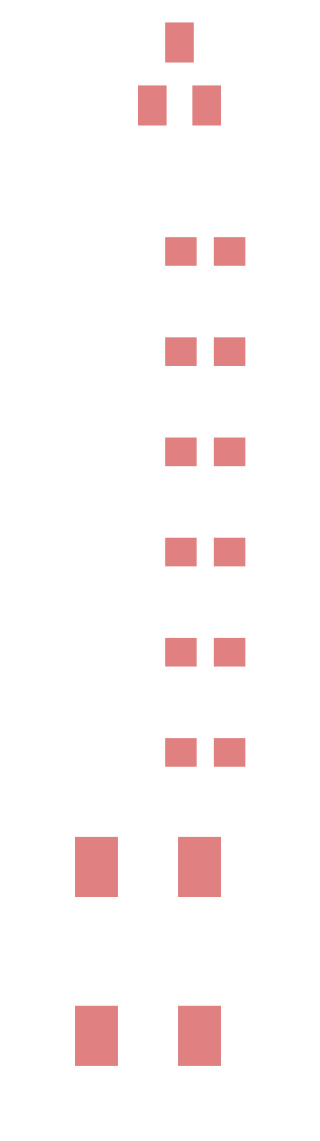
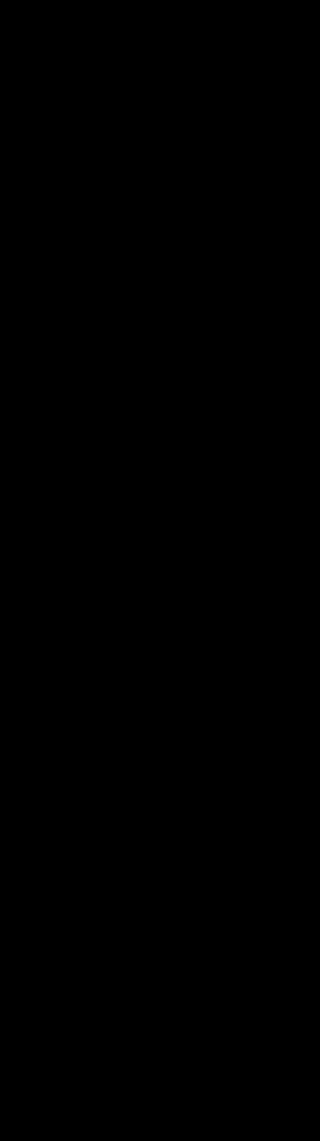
part: (179, 73) -> none
part: (205, 251) -> none
part: (205, 351) -> none
part: (205, 451) -> none
part: (205, 552) -> none
part: (205, 652) -> none
part: (205, 752) -> none
part: (147, 866) -> none
part: (147, 1035) -> none

